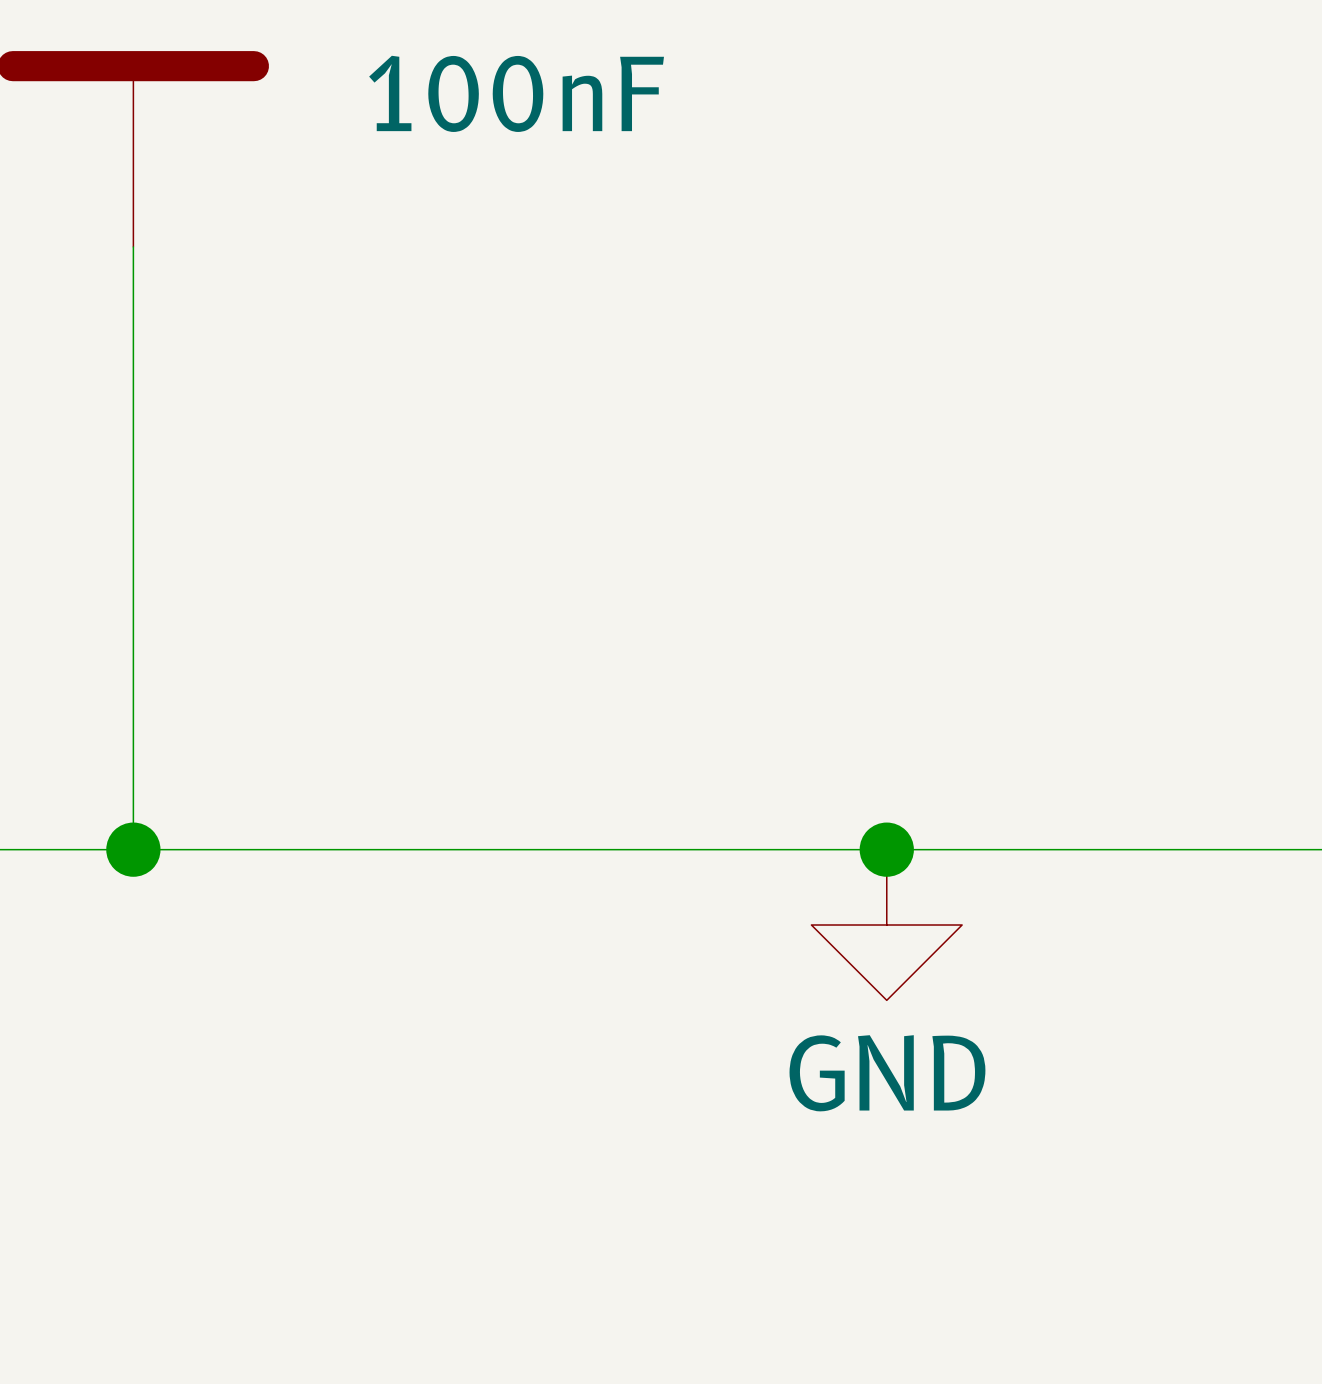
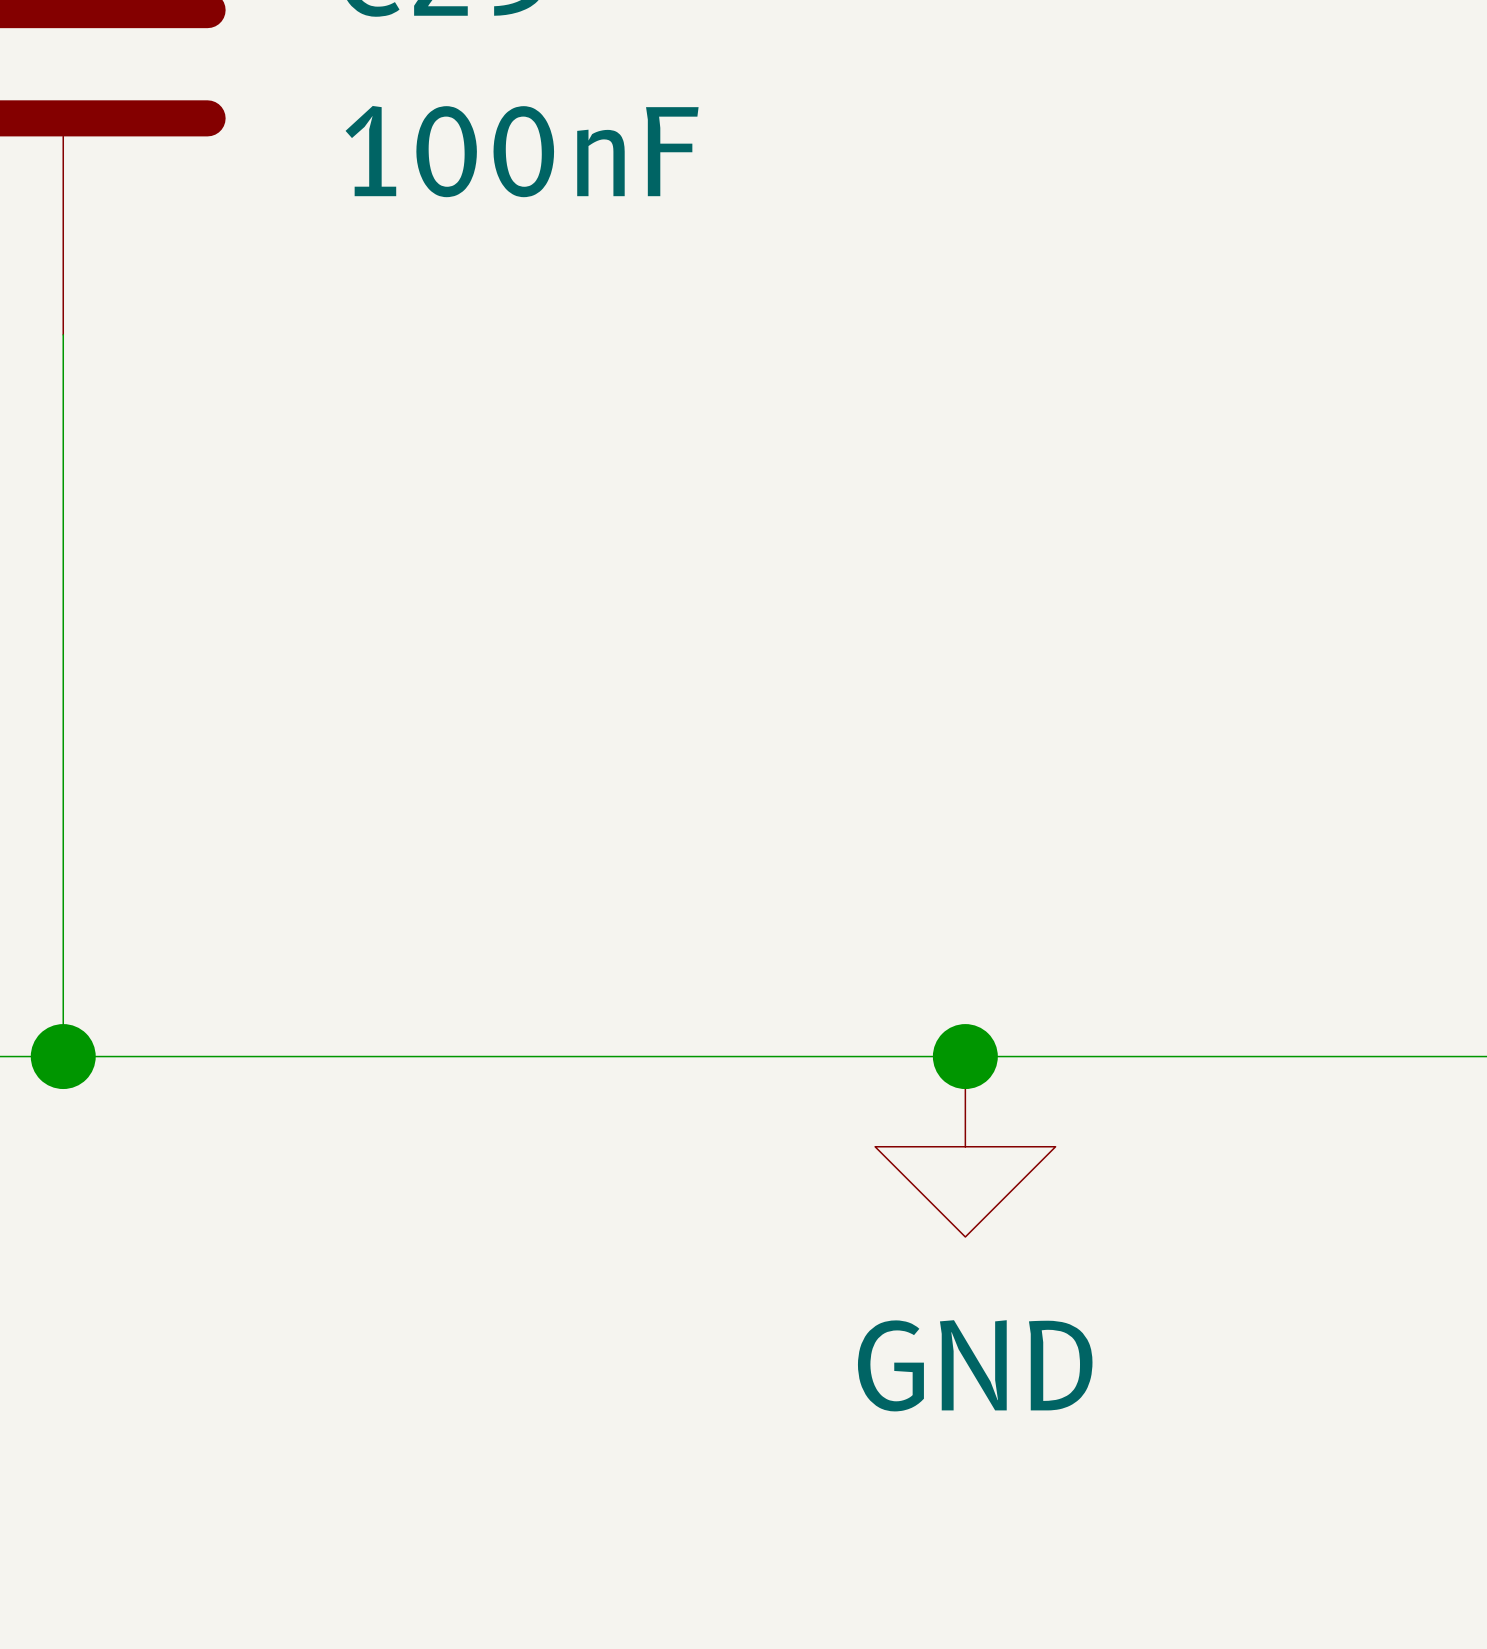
power symbol text position: GND (887, 1073) -> GND (975, 1365)

